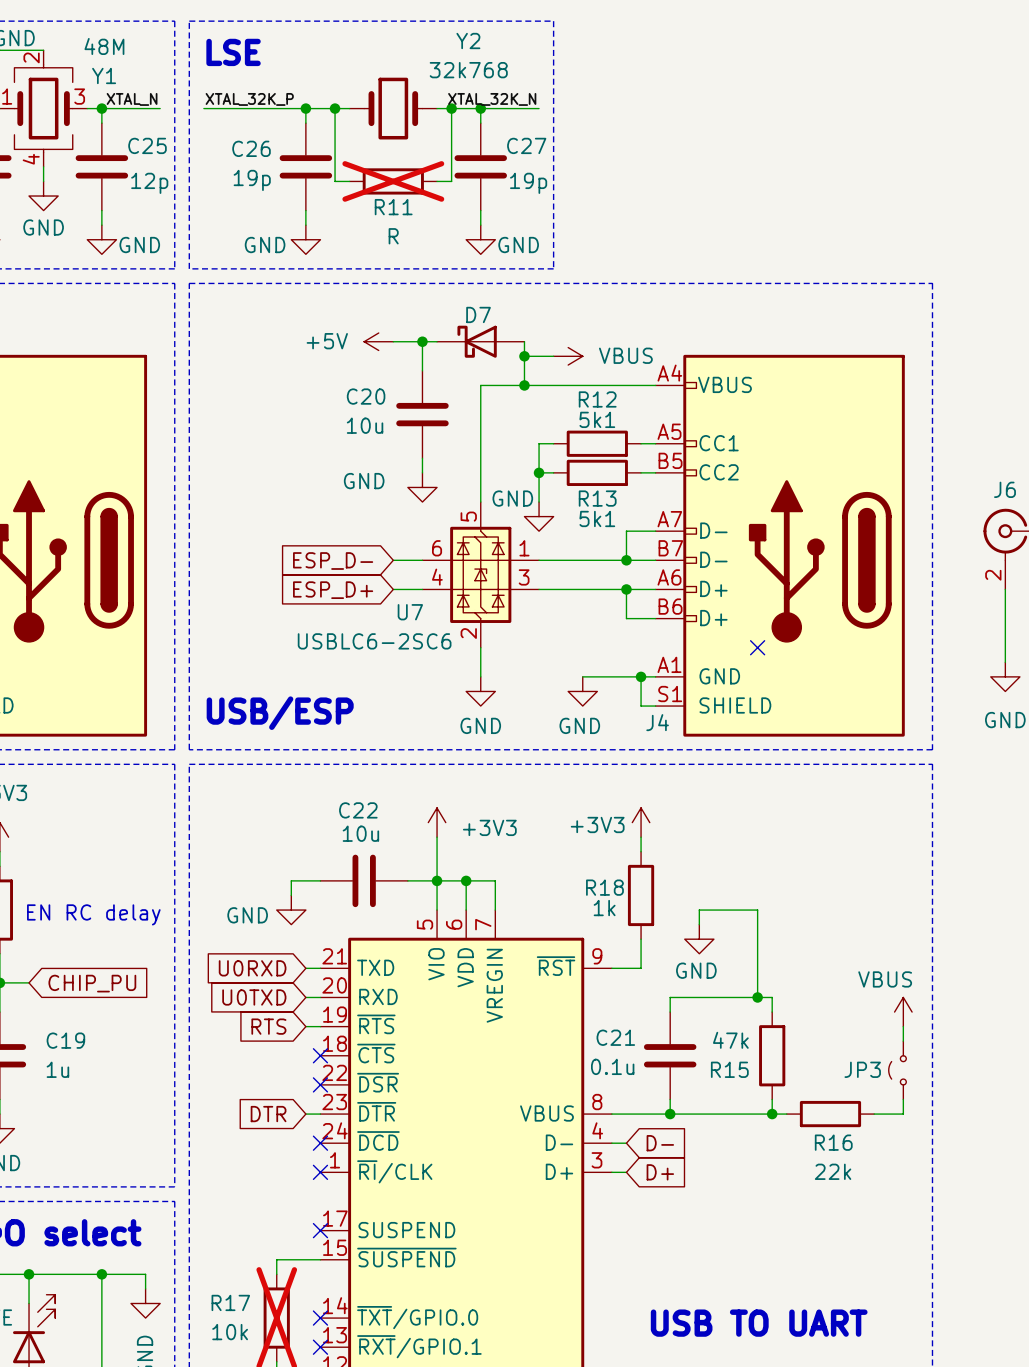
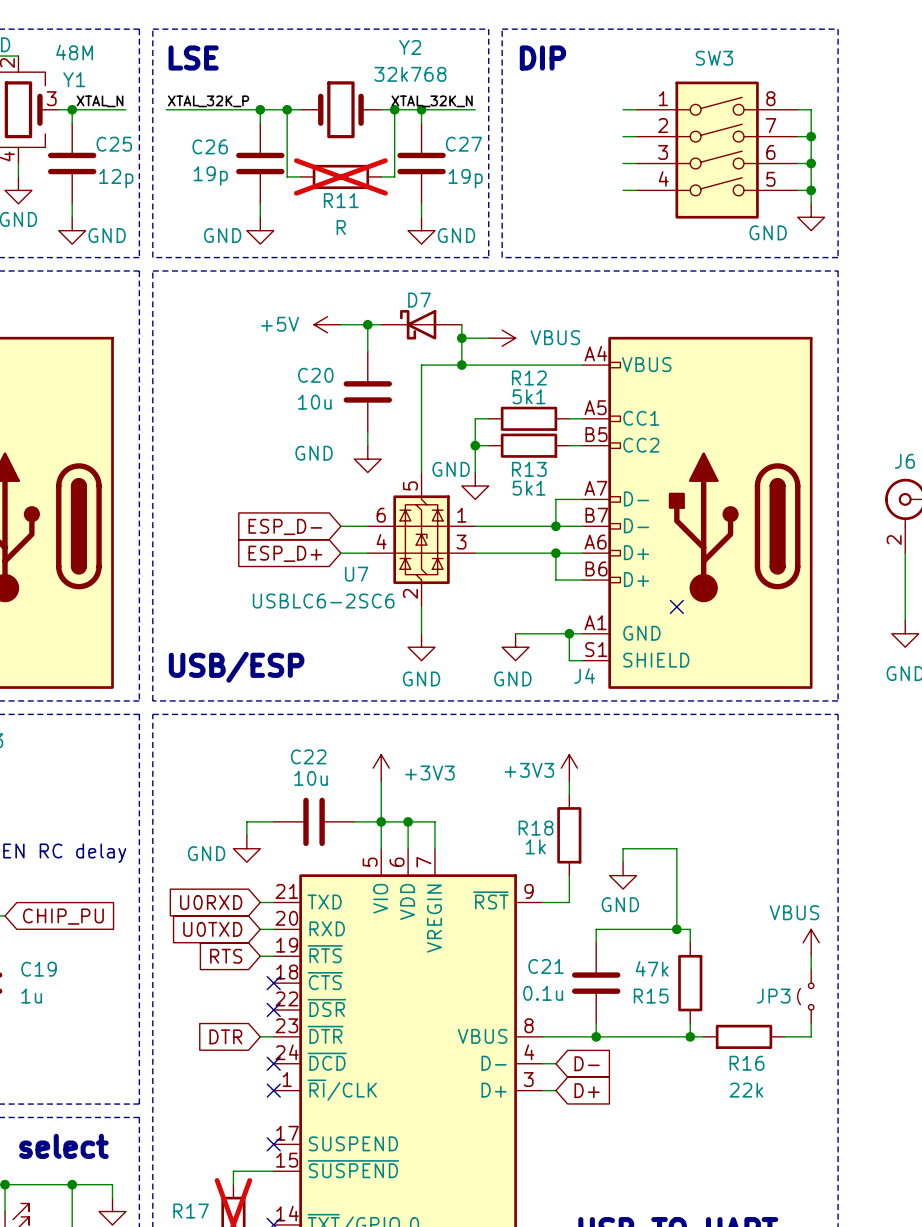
line: none -> (502, 29) (838, 29) (838, 257) (502, 257) (502, 29)
text: none -> DIP (542, 58)
wire: none -> (623, 109) (636, 109)
wire: none -> (797, 109) (811, 109) (811, 203)
wire: none -> (623, 136) (636, 136)
wire: none -> (797, 136) (811, 136)
junction: none -> (811, 136)
SW3: none -> (717, 150)
wire: none -> (623, 163) (636, 163)
wire: none -> (797, 163) (811, 163)
junction: none -> (811, 163)
wire: none -> (623, 190) (636, 190)
wire: none -> (797, 190) (811, 190)
junction: none -> (811, 190)
power symbol: none -> GND (811, 217)

